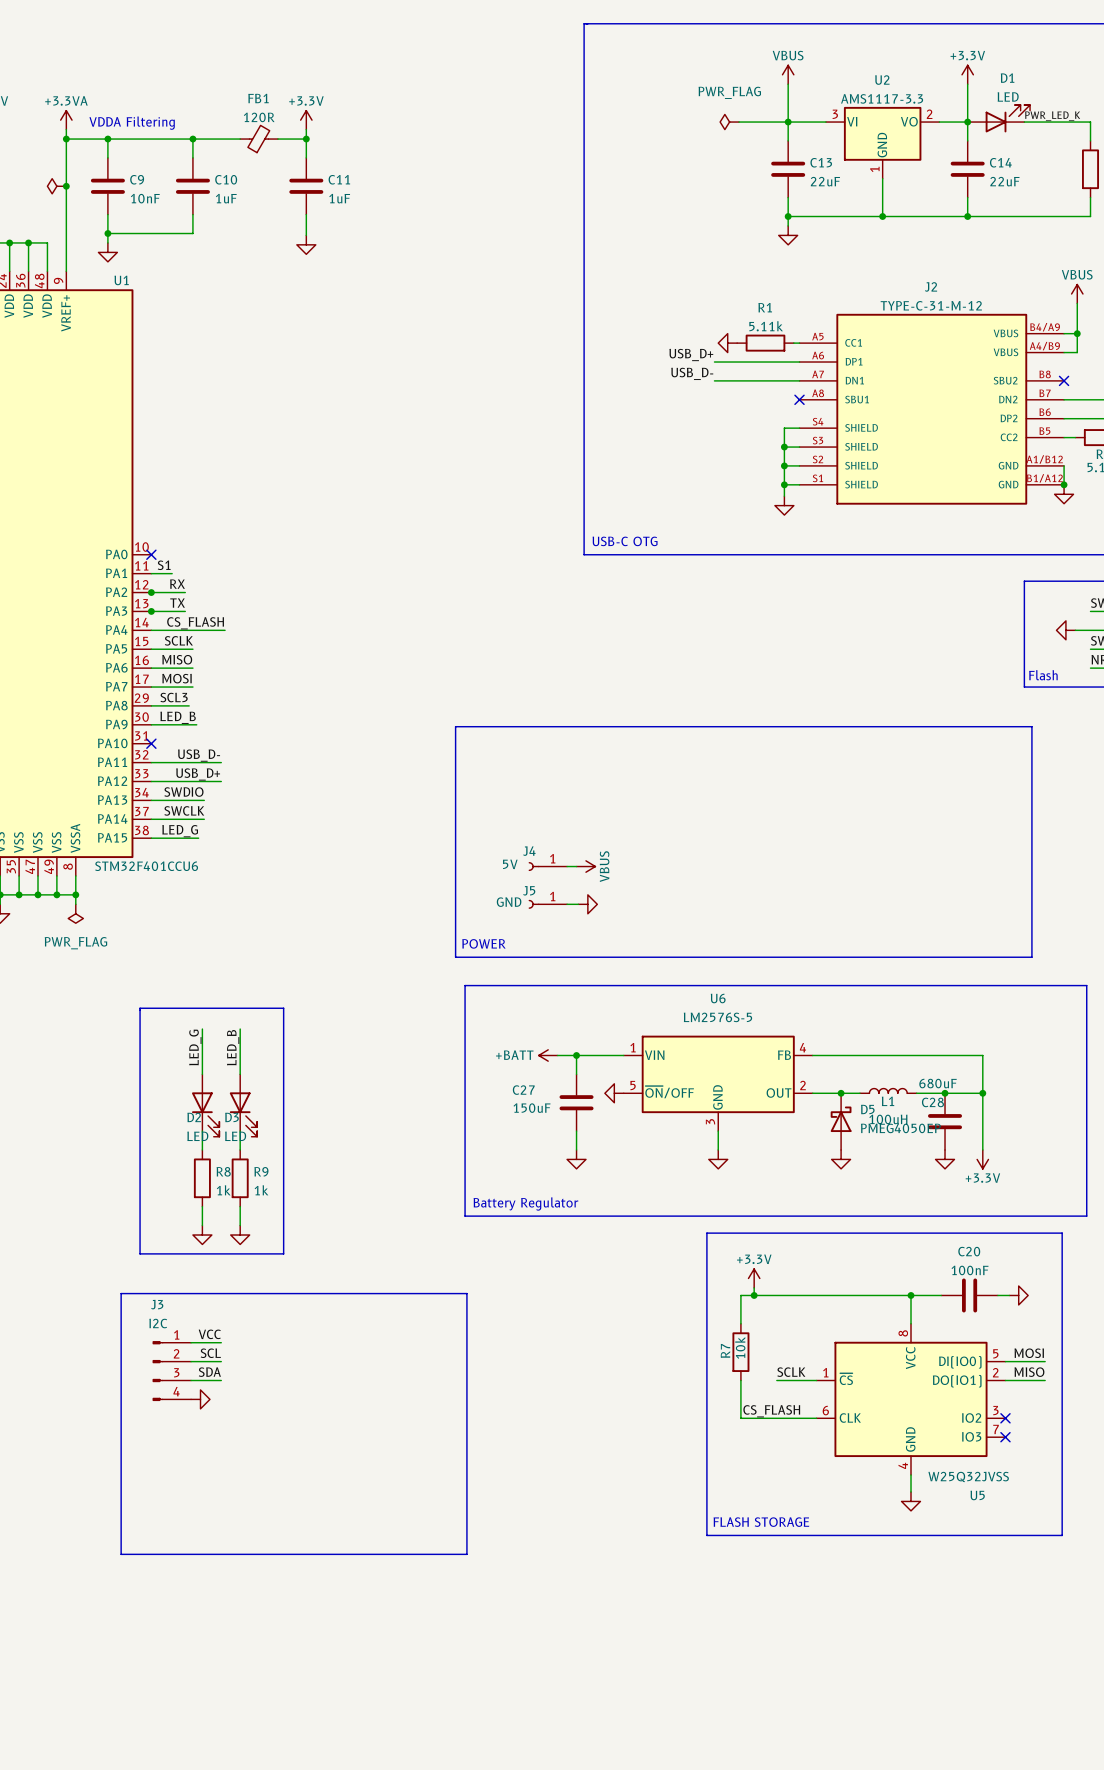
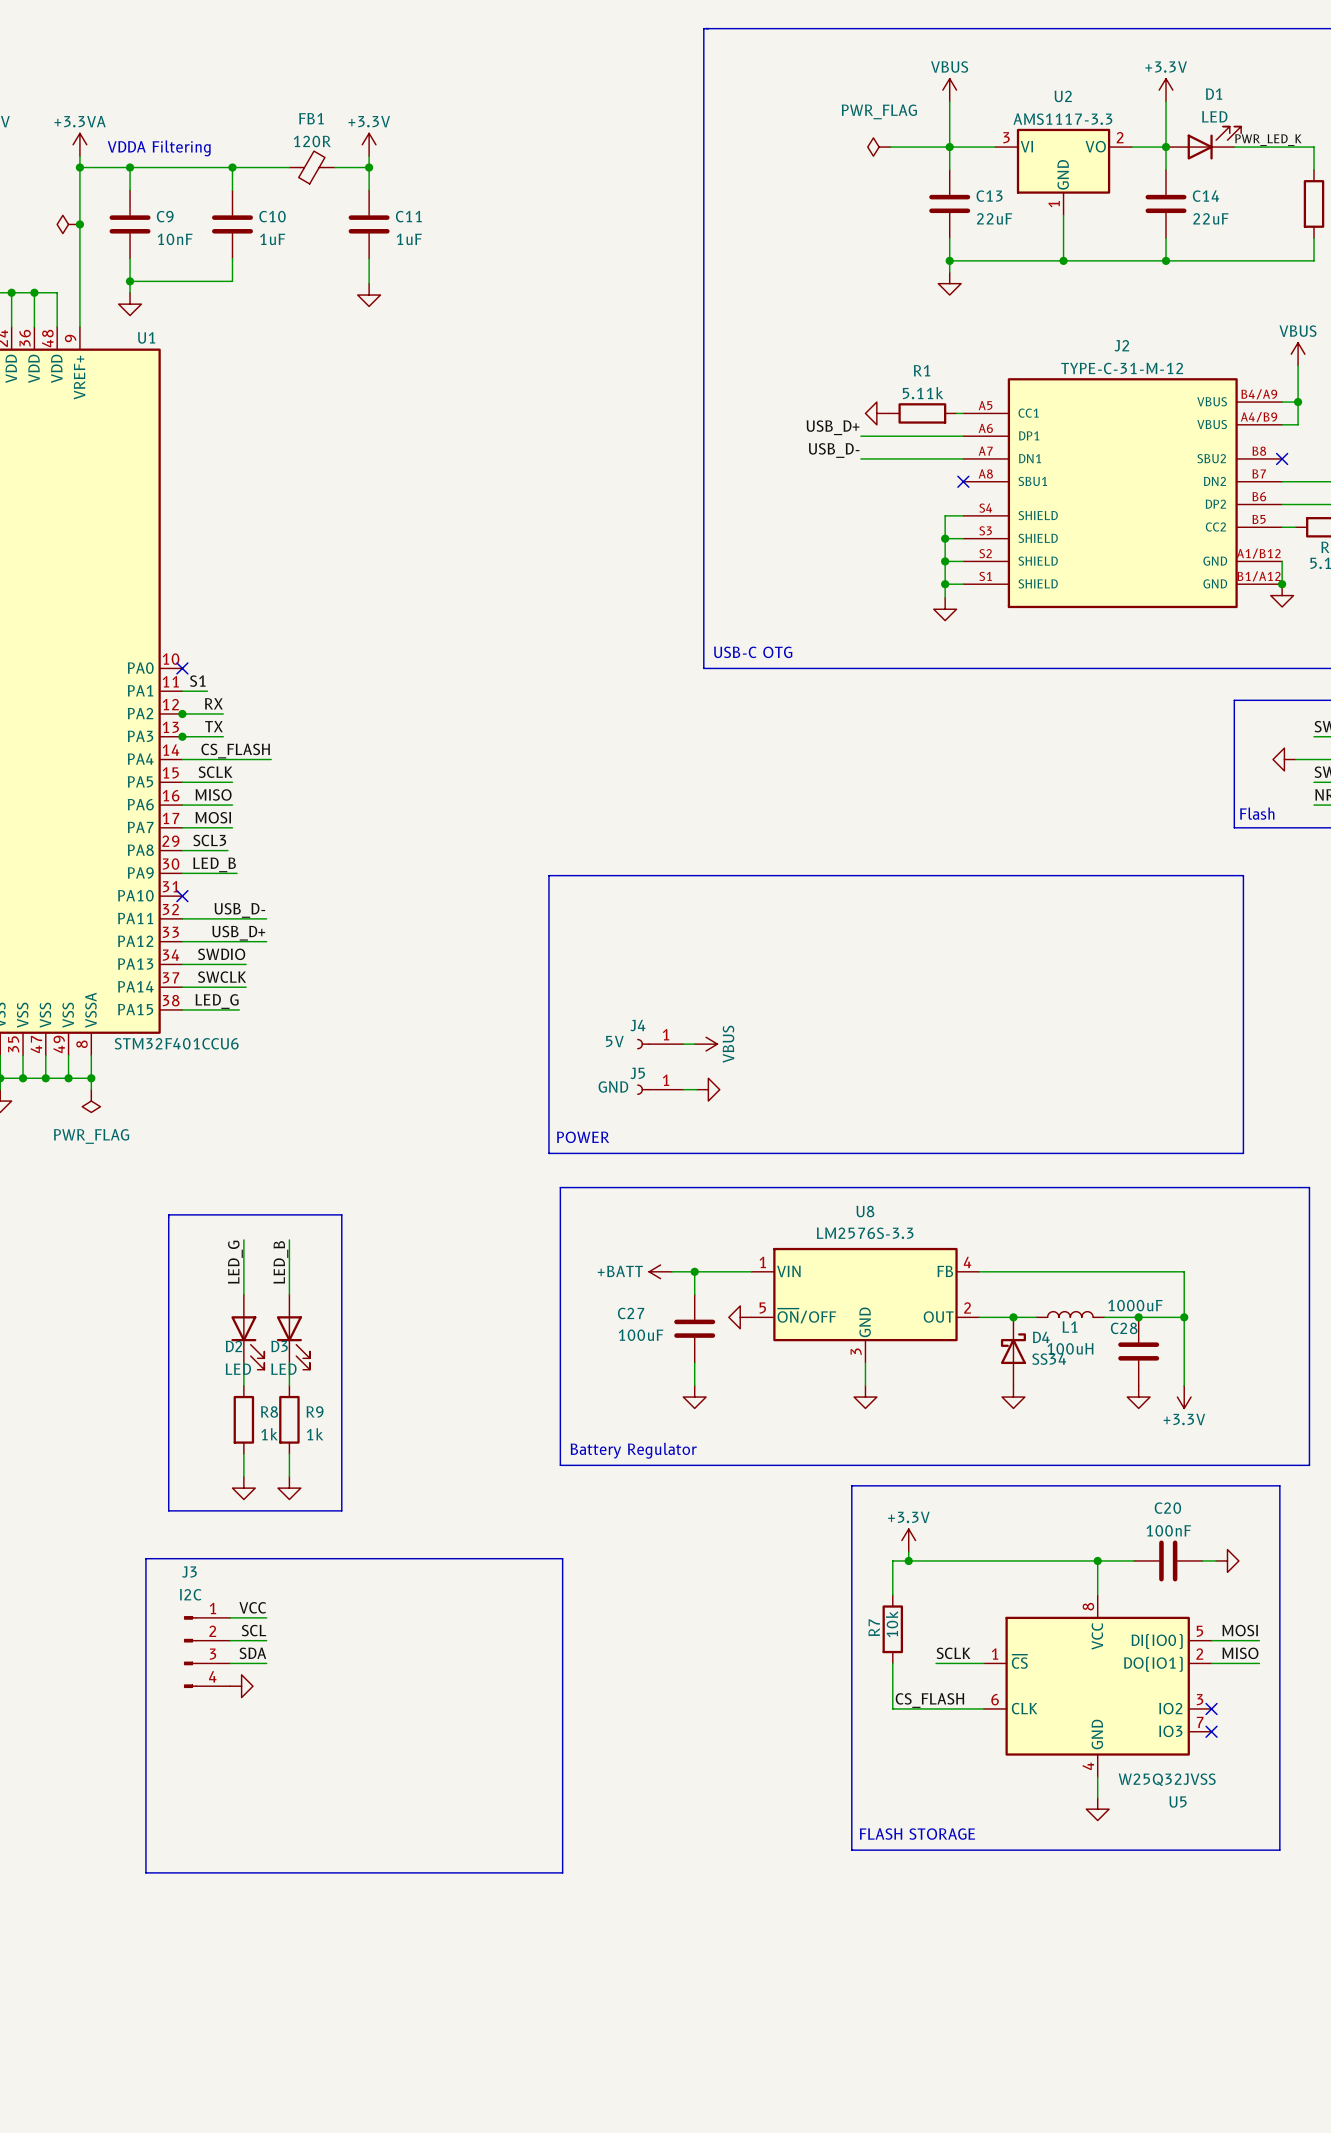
U6 name: U6 (718, 998) -> U8 (865, 1211)
U6 value: LM2576S-5 (717, 1017) -> LM2576S-3.3 (865, 1233)
C28 value: 680uF (938, 1083) -> 1000uF (1135, 1305)
C27 value: 150uF (532, 1108) -> 100uF (641, 1335)
D5 name: D5 (867, 1109) -> D4 (1041, 1337)
D5 value: PMEG4050EP (900, 1128) -> SS34 (1049, 1359)

